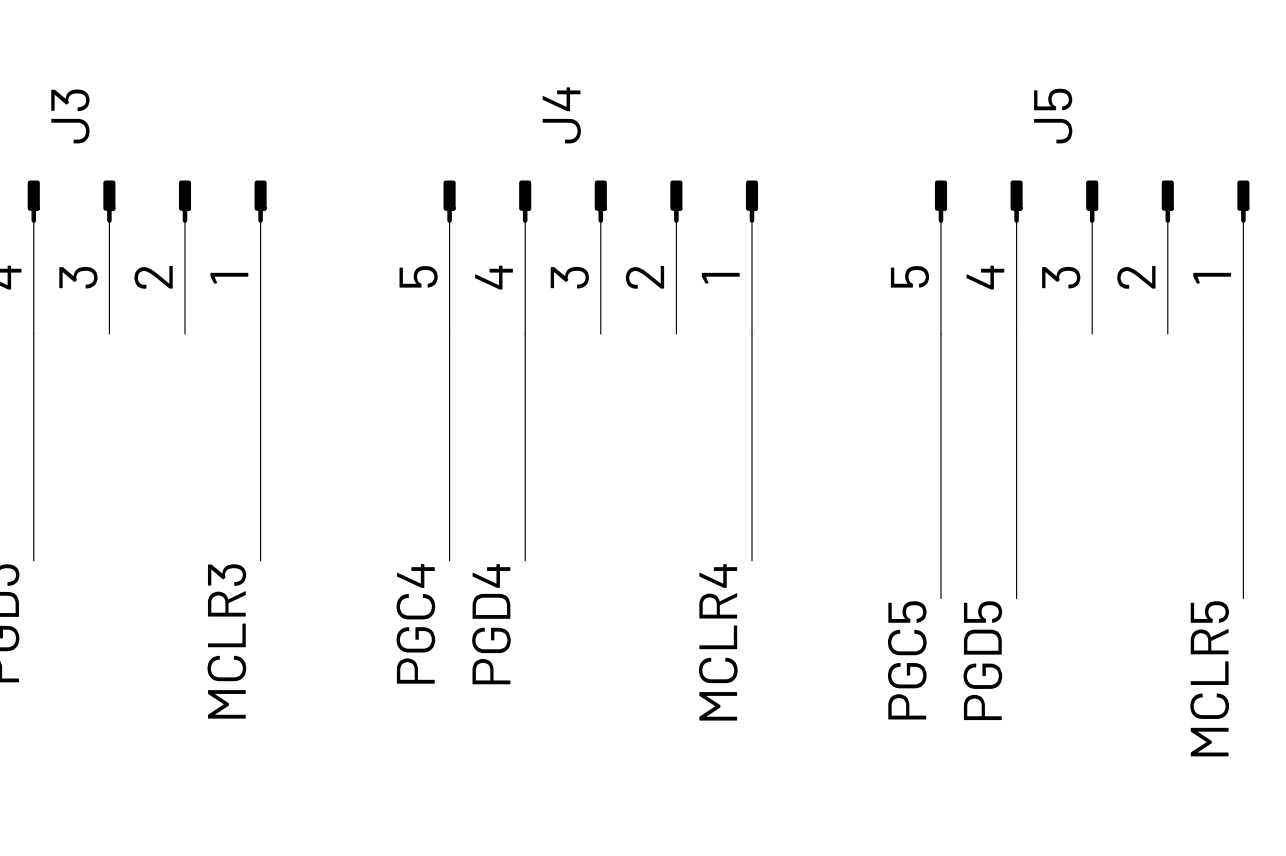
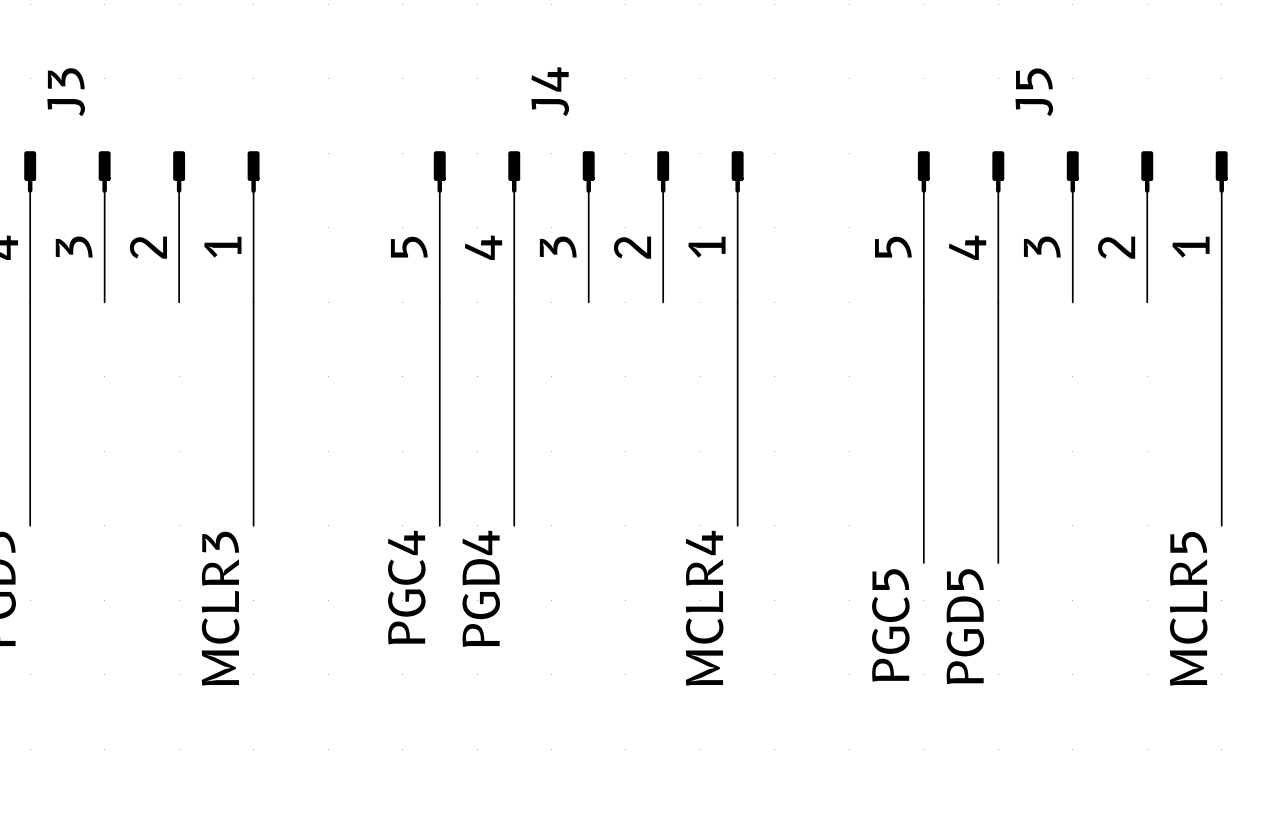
wire: (1243, 560) (1243, 598) -> none
label position: MCLR5 (1209, 678) -> MCLR5 (1188, 608)

